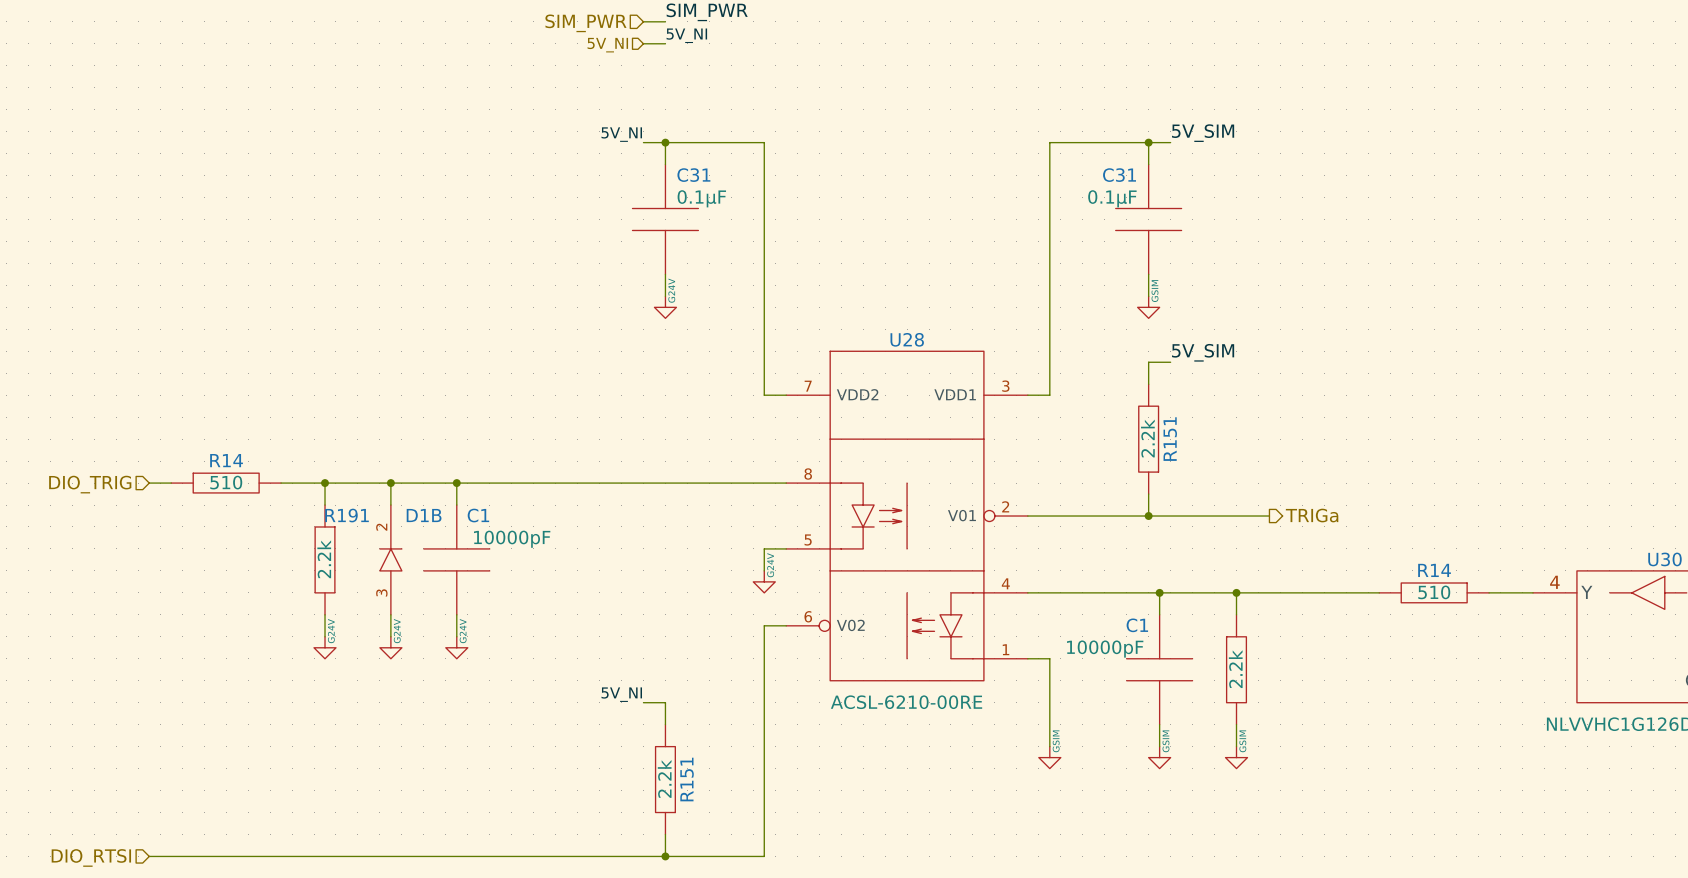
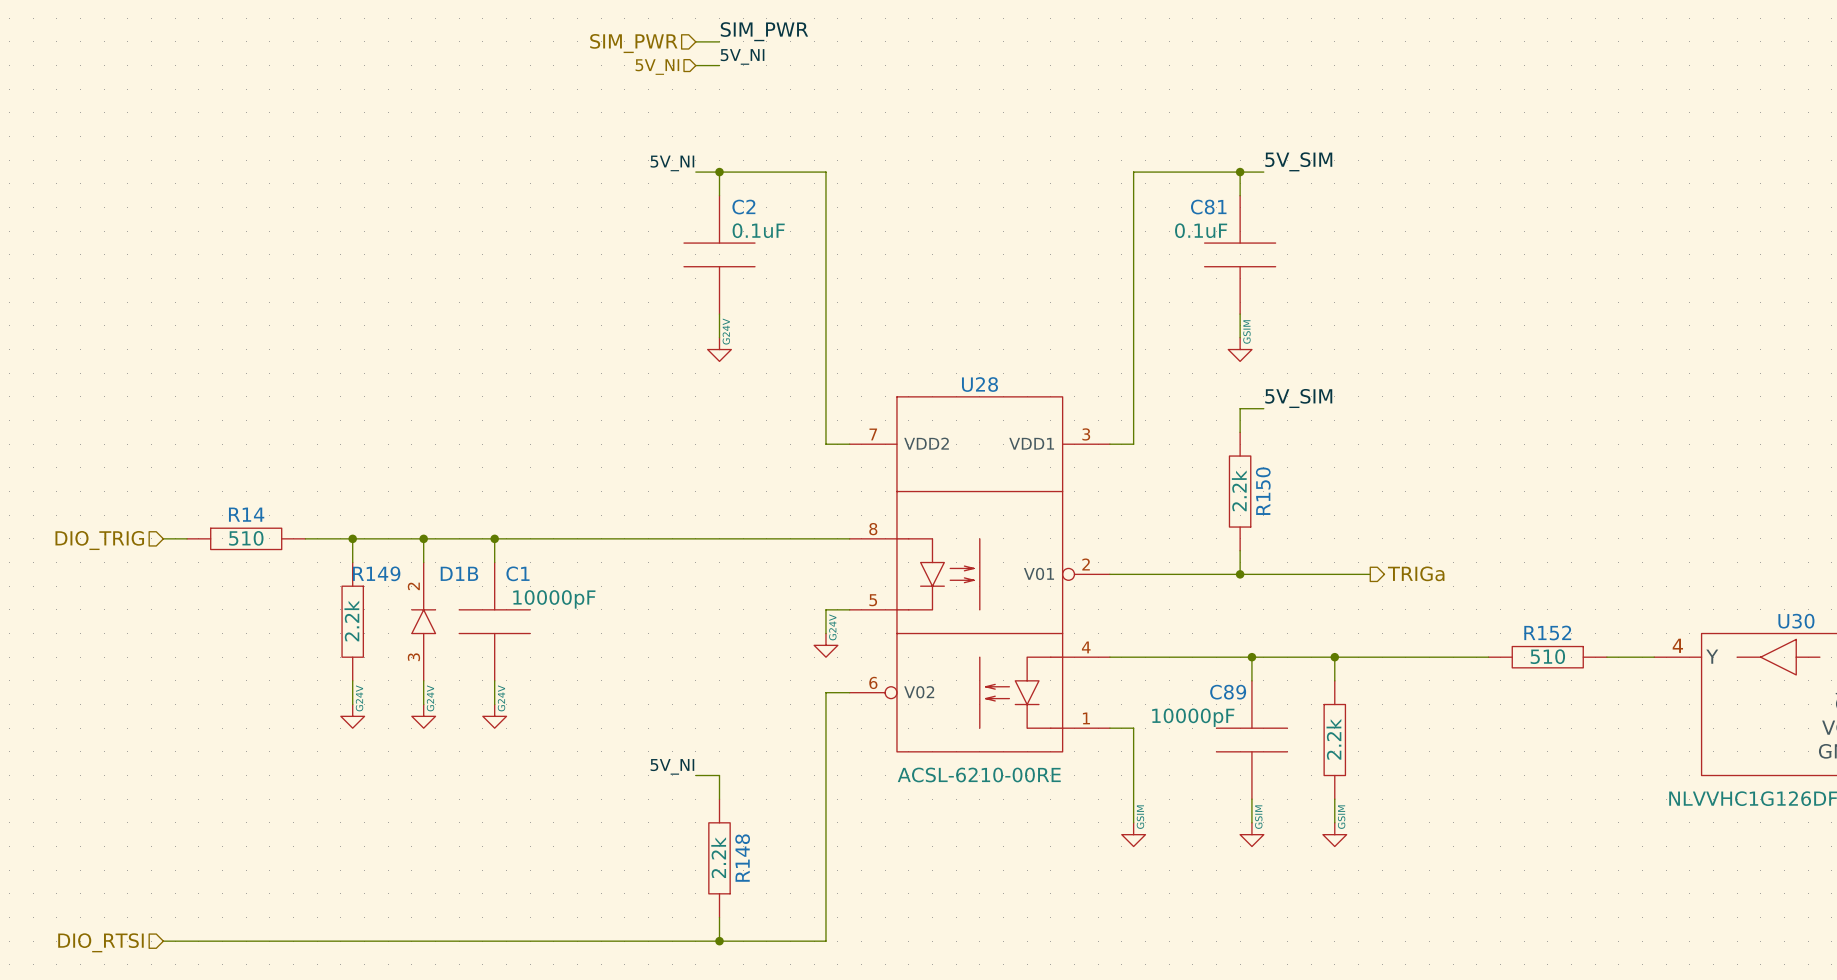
C31 name: C31 (693, 175) -> C2 (743, 207)
C31 name: C31 (1119, 175) -> C81 (1208, 207)
C31 text: 0.1µF (701, 198) -> 0.1uF (758, 230)
C31 text: 0.1µF (1112, 198) -> 0.1uF (1201, 230)
R151 name: R151 (1170, 439) -> R150 (1263, 491)
R191 name: R191 (347, 515) -> R149 (376, 573)
R14 name: R14 (1434, 570) -> R152 (1547, 633)
C1 name: C1 (1137, 625) -> C89 (1228, 692)
R151 name: R151 (687, 779) -> R148 (742, 858)

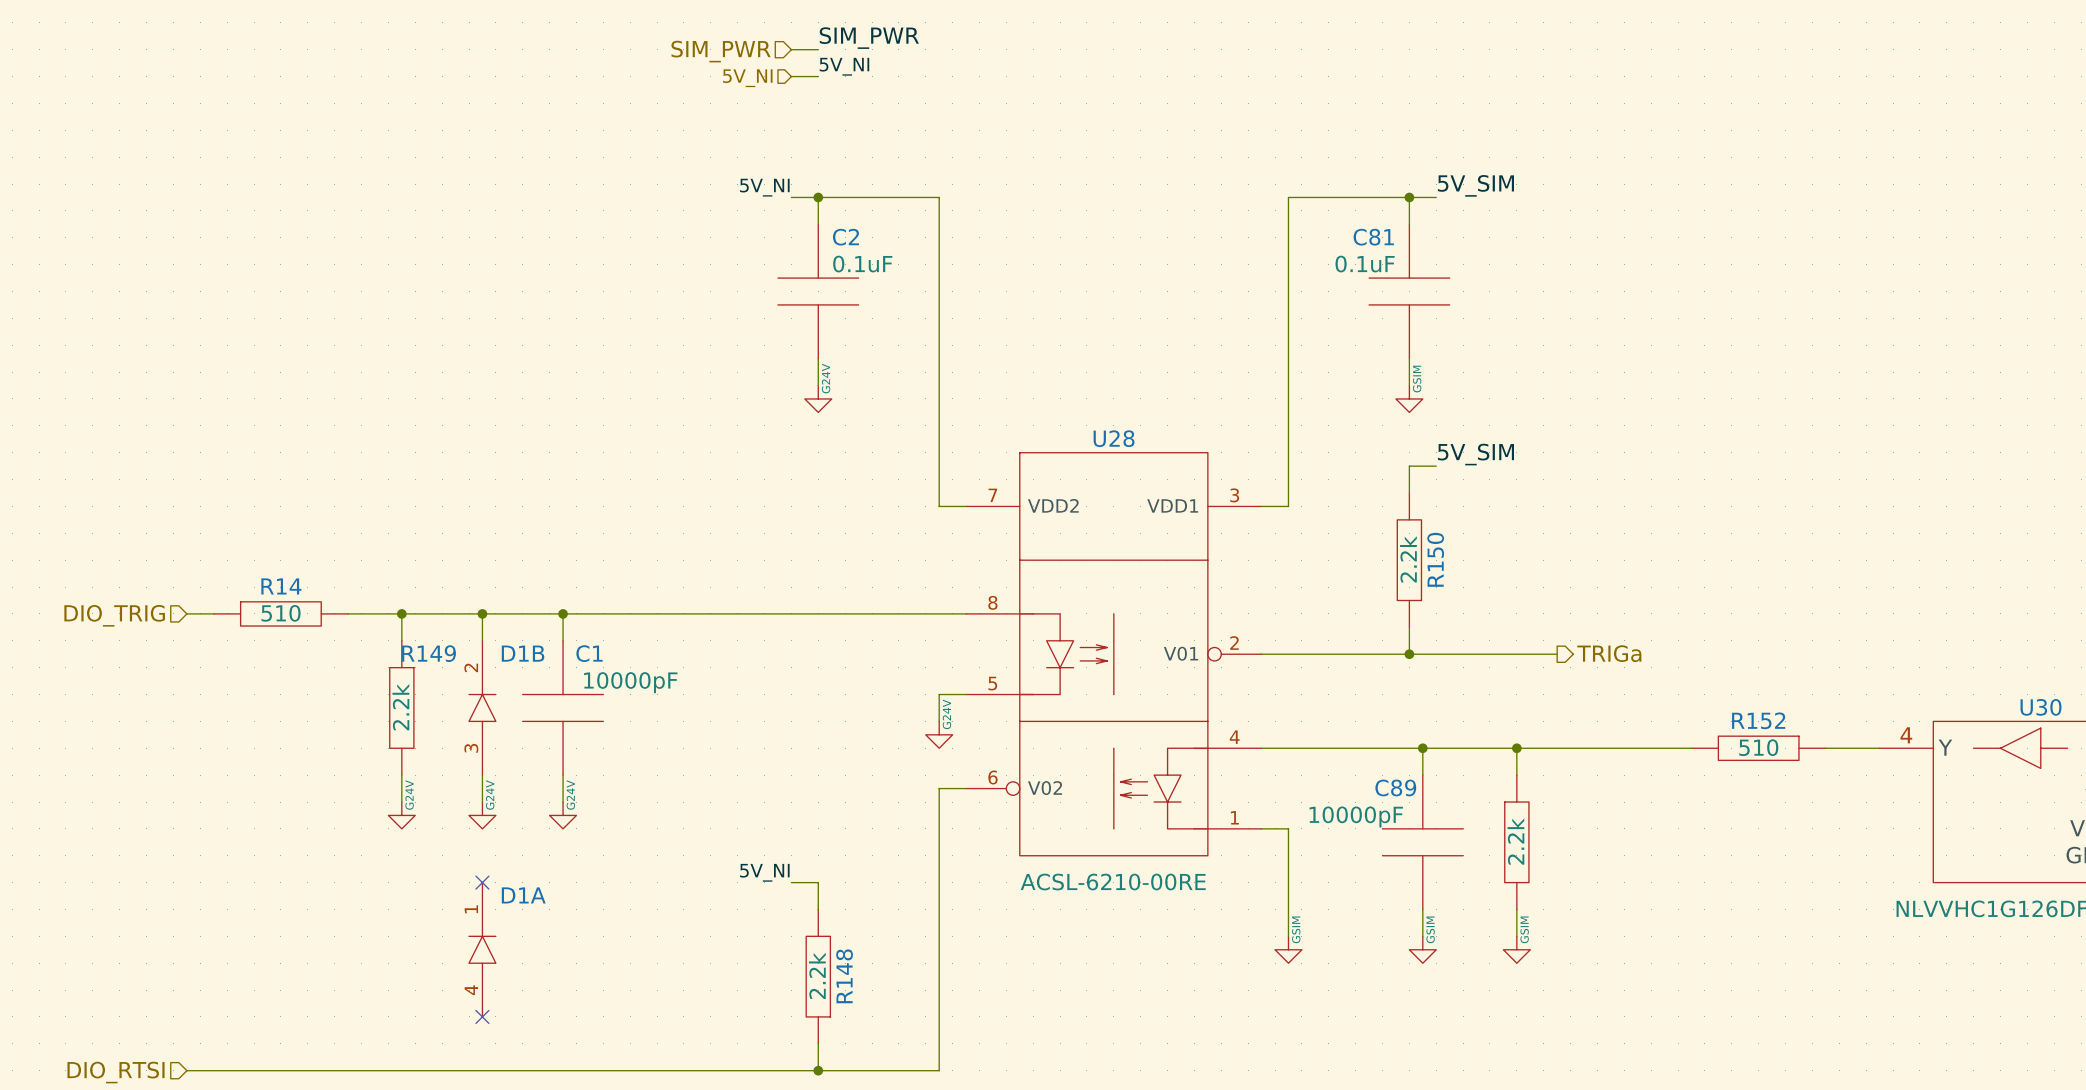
no-connect mark: none -> (482, 882)
D1A: none -> (482, 949)
no-connect mark: none -> (482, 1016)

